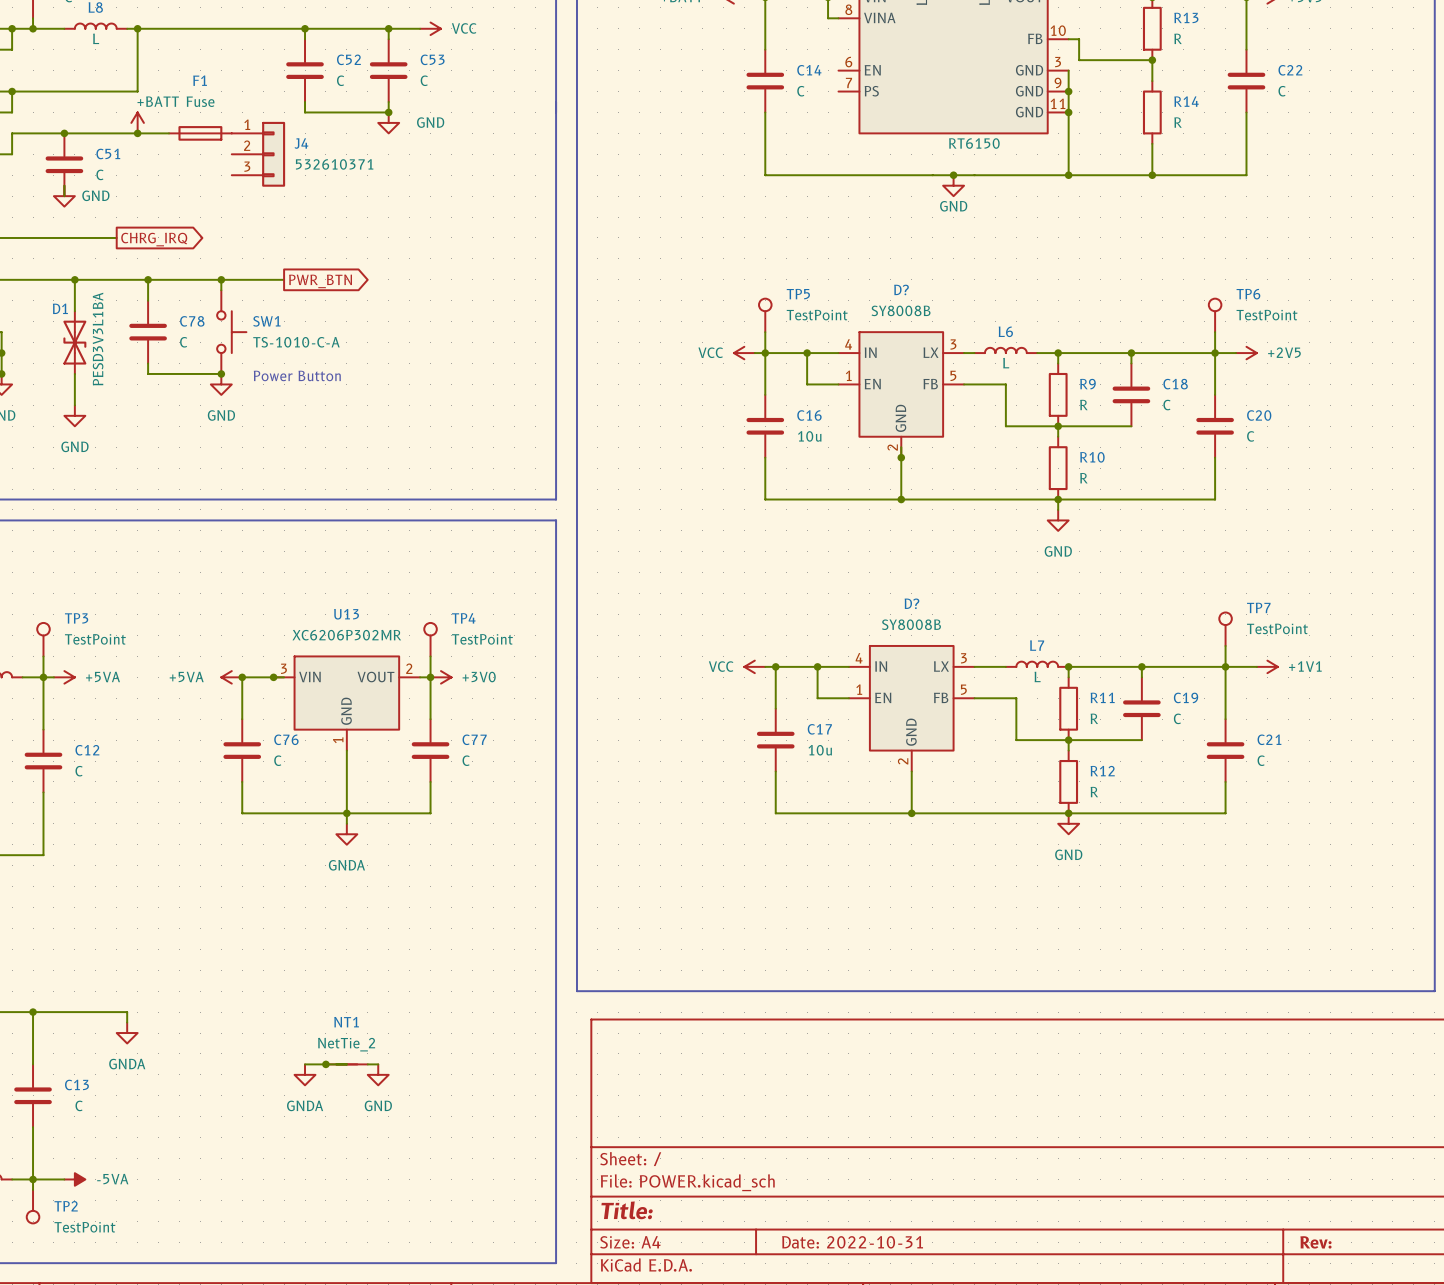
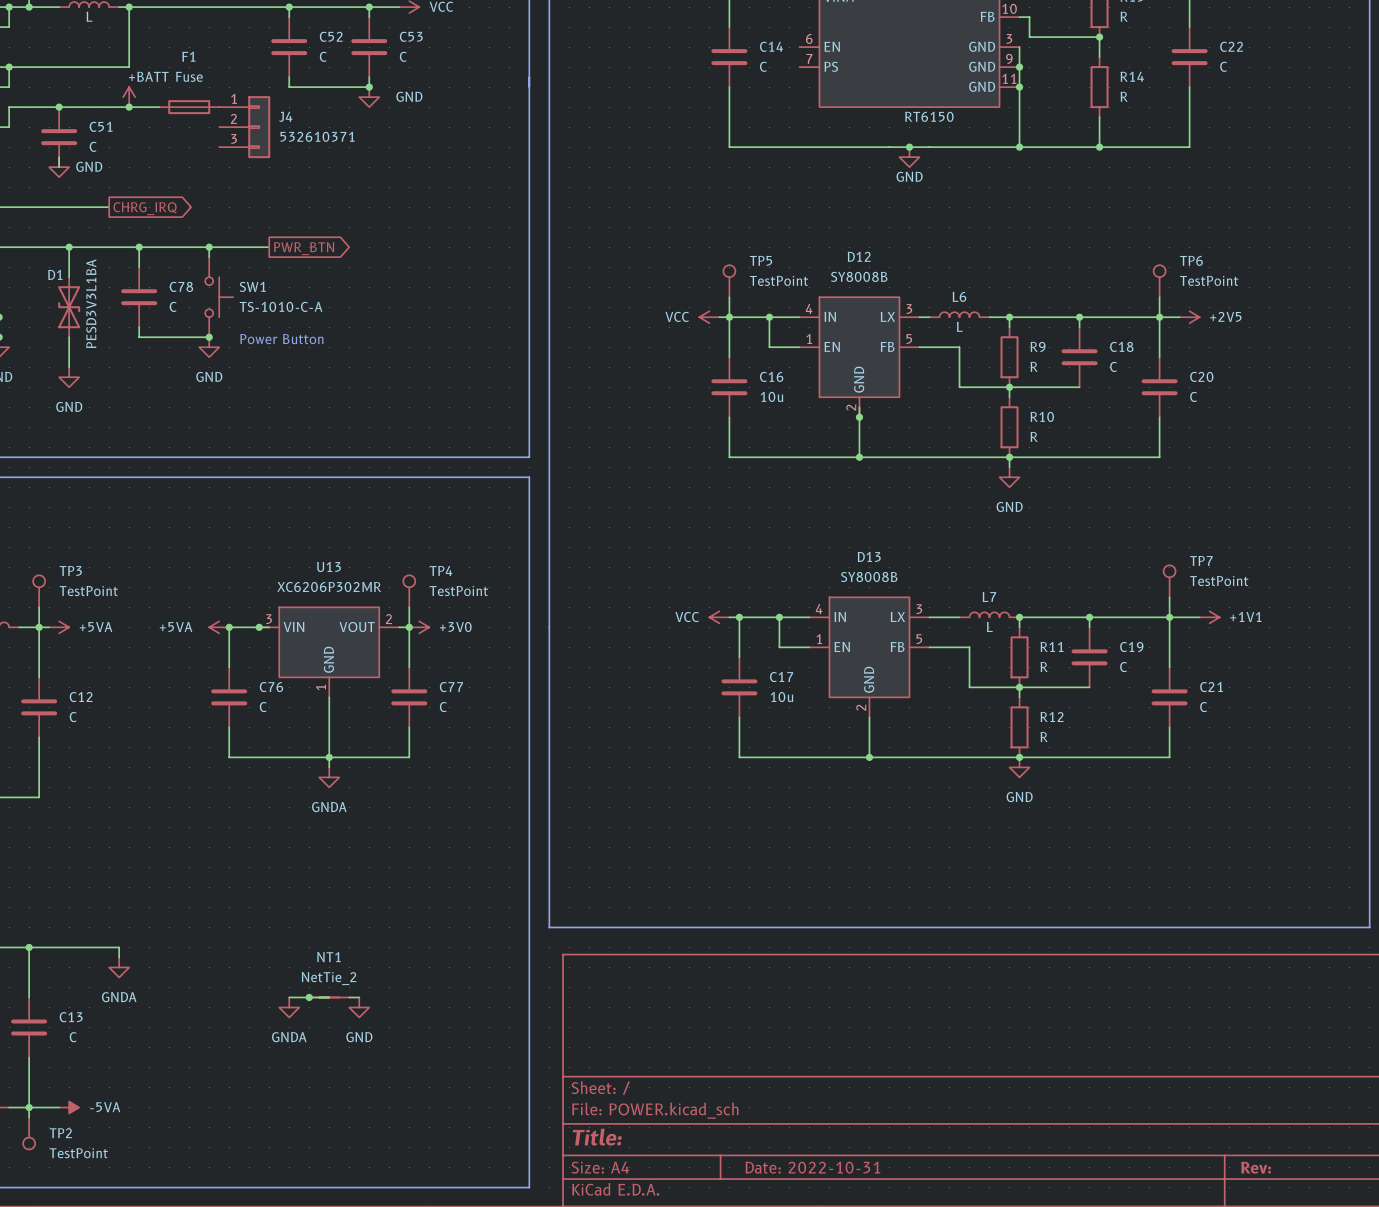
D? name: D? (901, 289) -> D12 (859, 256)
D? name: D? (911, 603) -> D13 (869, 556)

